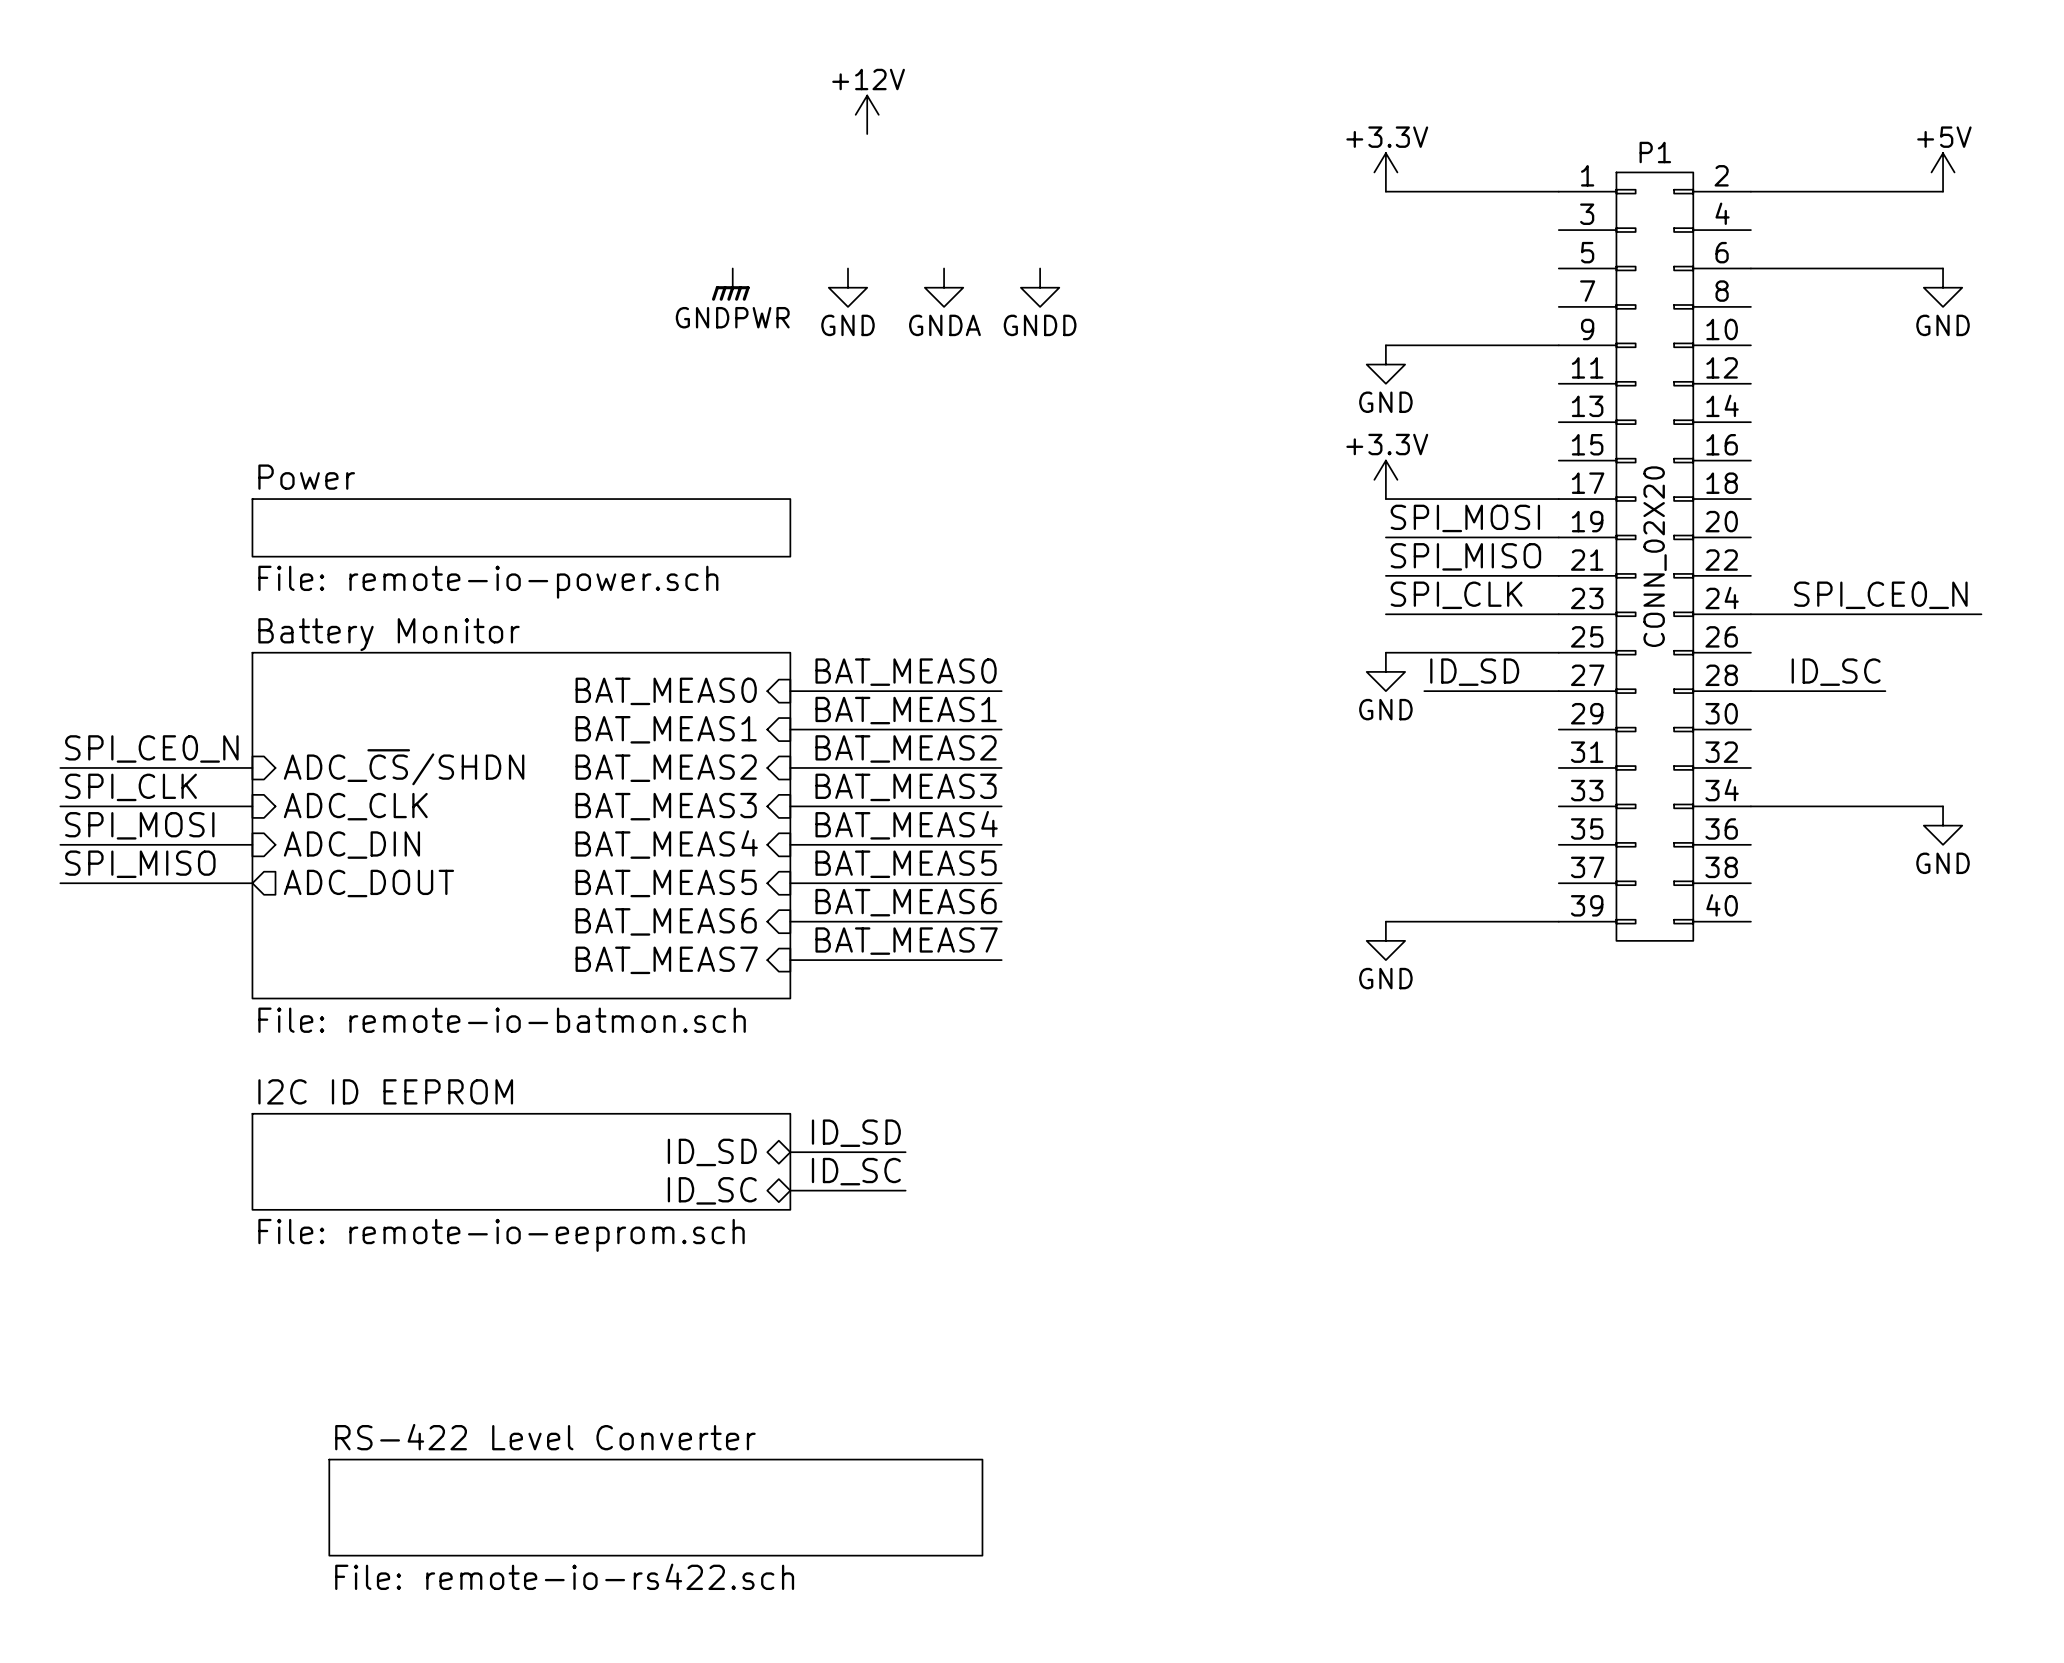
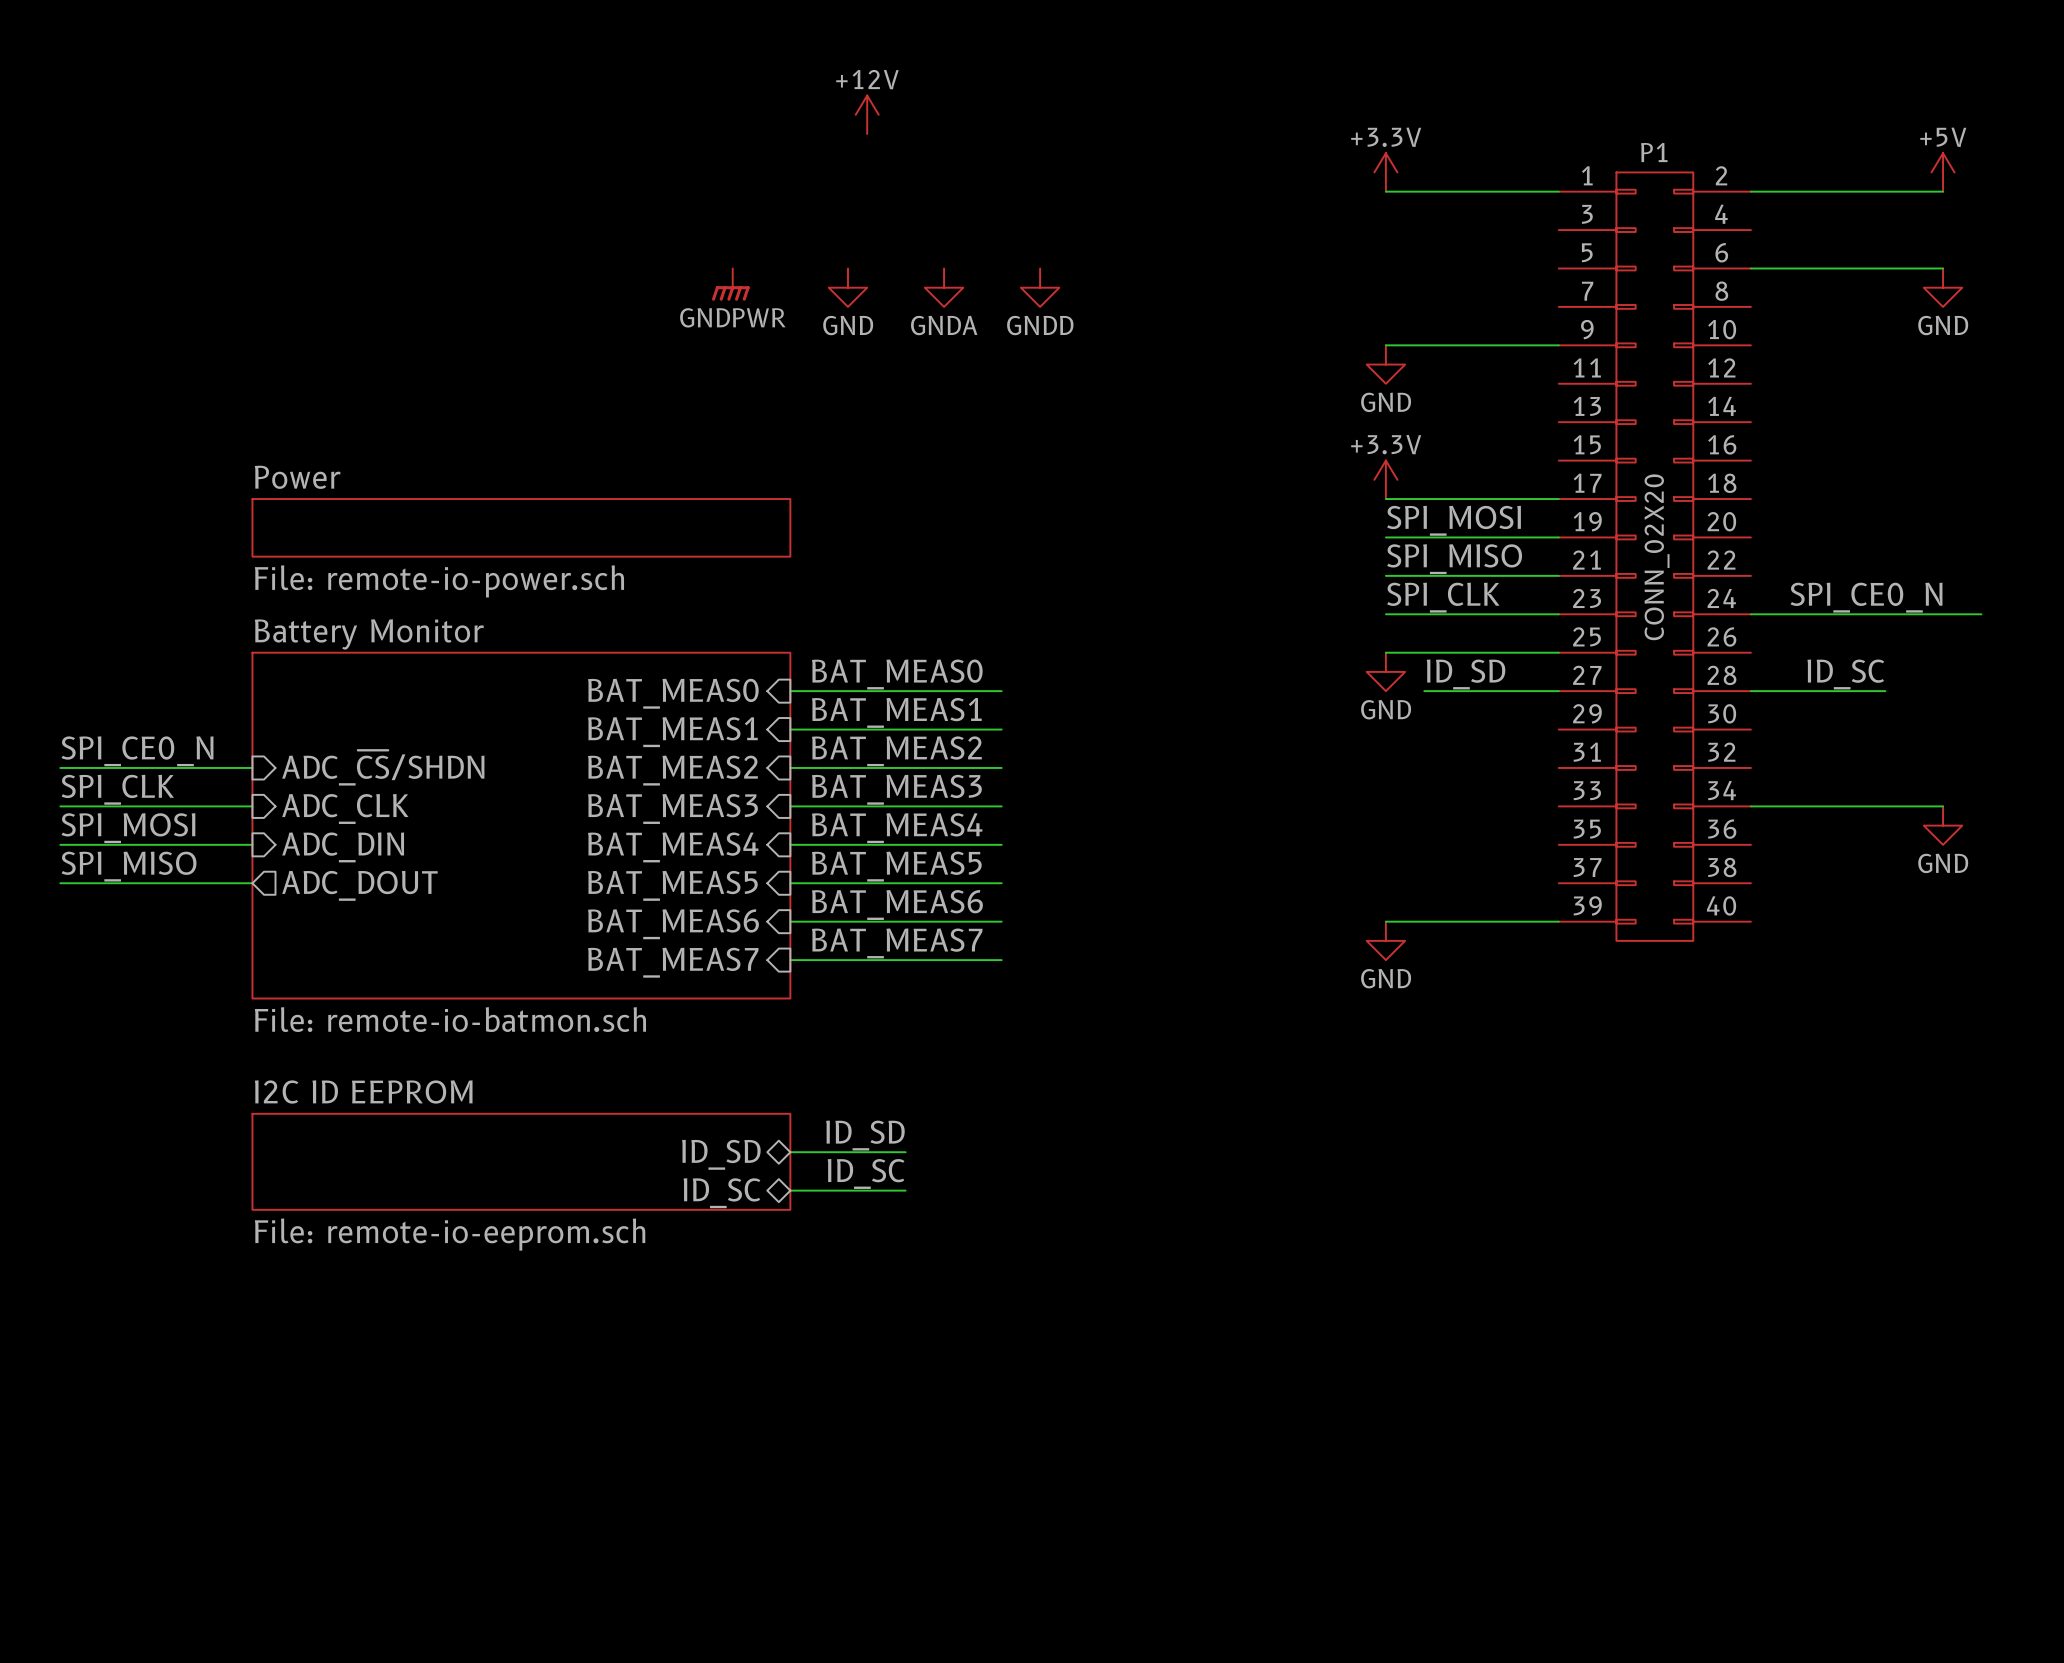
sheet RS-422 Level Converter: File: remote-io-rs422.sch (655, 1507) -> none

